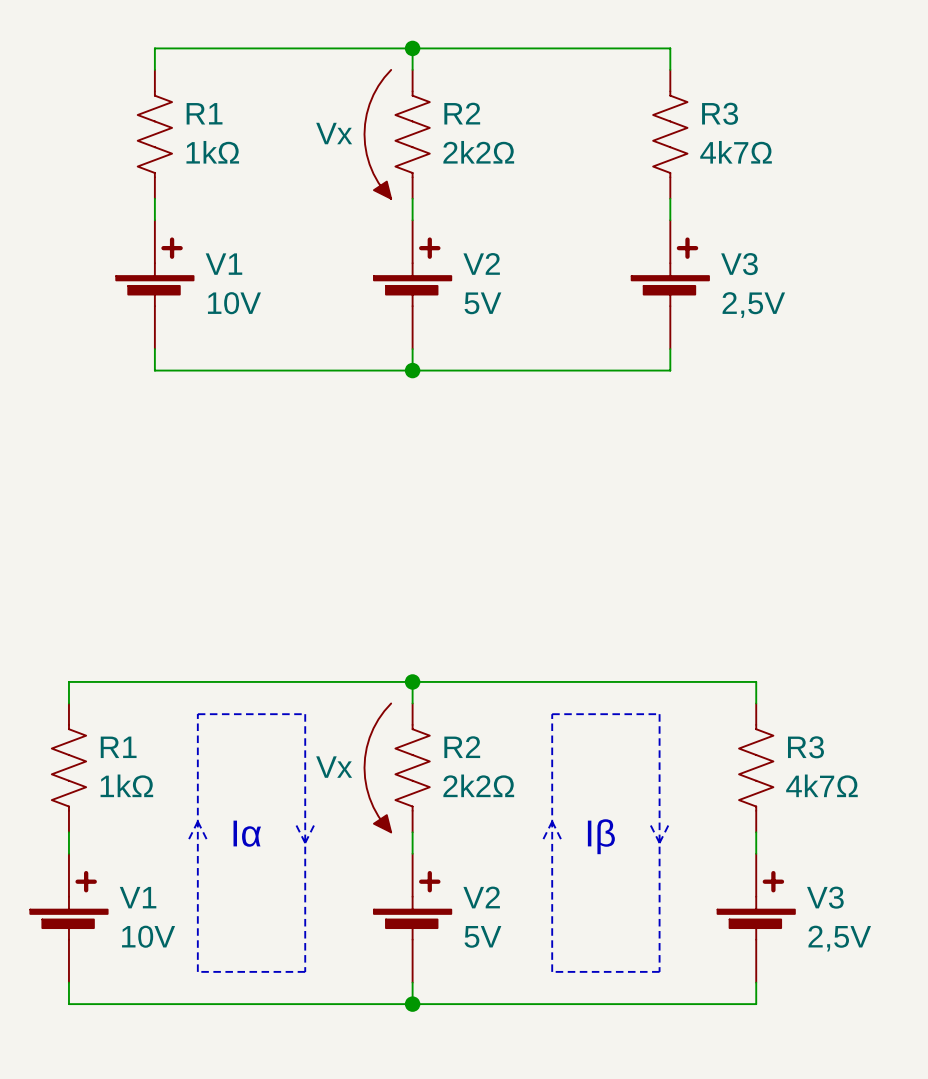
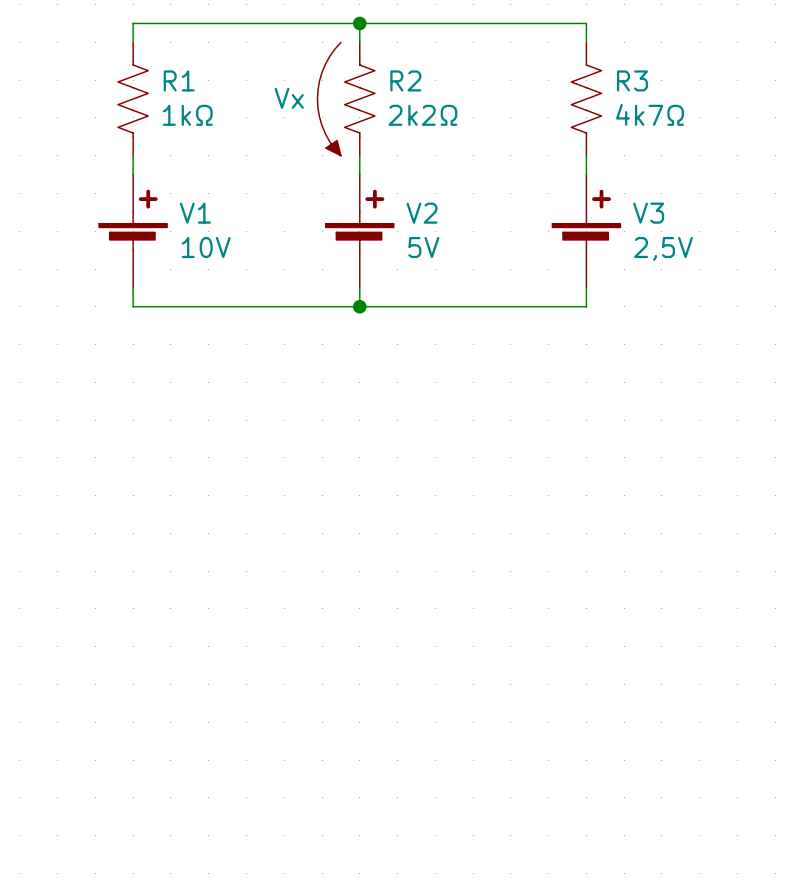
wire: (412, 681) (412, 703) -> none
junction: (412, 681) -> none
wire: (68, 703) (68, 681) (756, 681) (756, 703) -> none
line: (197, 714) (197, 971) (305, 971) (305, 714) (197, 714) -> none
line: (552, 714) (659, 714) (659, 971) (552, 971) (552, 714) -> none
R1: 1kΩ (68, 767) -> none
Vx: (377, 767) -> none
R2: 2k2Ω (412, 767) -> none
R3: 4k7Ω (756, 767) -> none
line: (294, 821) (305, 843) (315, 821) -> none
line: (648, 821) (659, 843) (670, 821) -> none
wire: (68, 832) (68, 853) -> none
wire: (412, 832) (412, 853) -> none
wire: (756, 832) (756, 853) -> none
text: Iα (247, 833) -> none
text: Iβ (601, 836) -> none
line: (187, 843) (197, 821) (208, 843) -> none
line: (541, 843) (552, 821) (562, 843) -> none
V1: 10V (68, 918) -> none
V2: 5V (412, 918) -> none
V3: 2,5V (756, 918) -> none
wire: (68, 982) (68, 1004) (756, 1004) (756, 982) -> none
wire: (412, 982) (412, 1004) -> none
junction: (412, 1004) -> none

